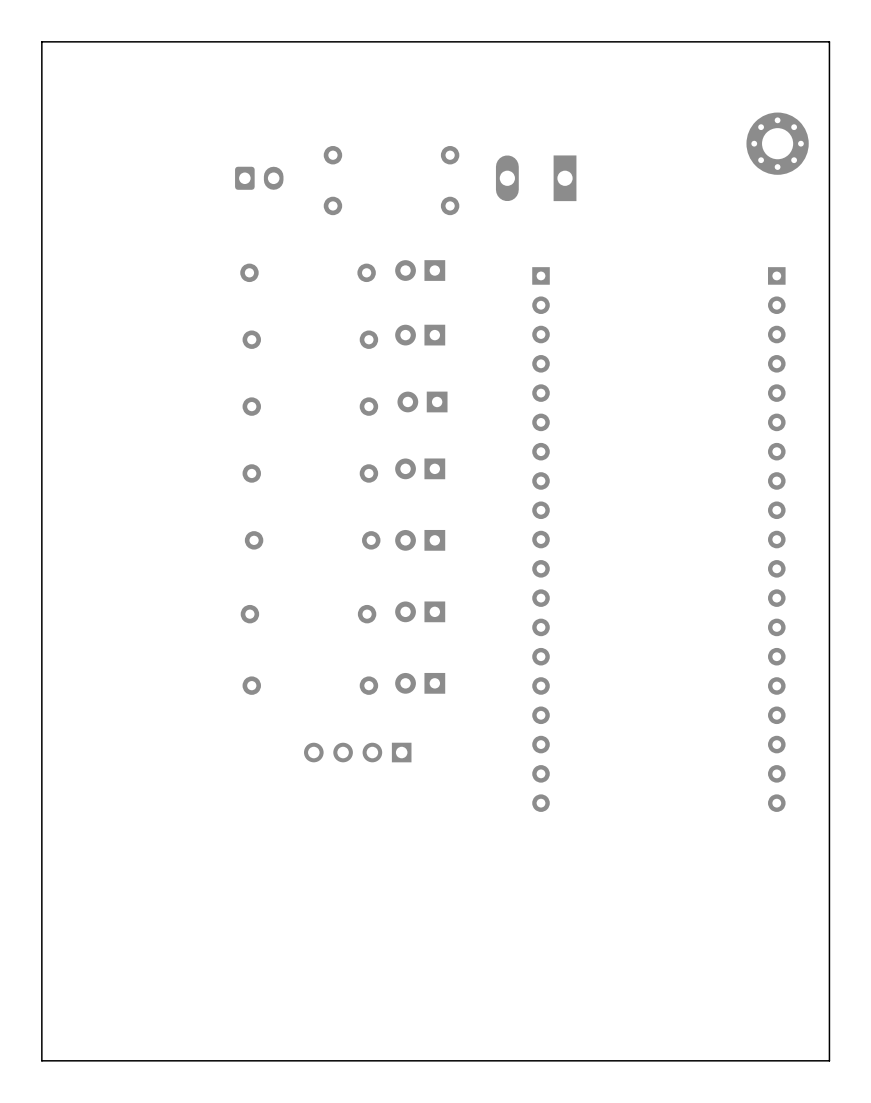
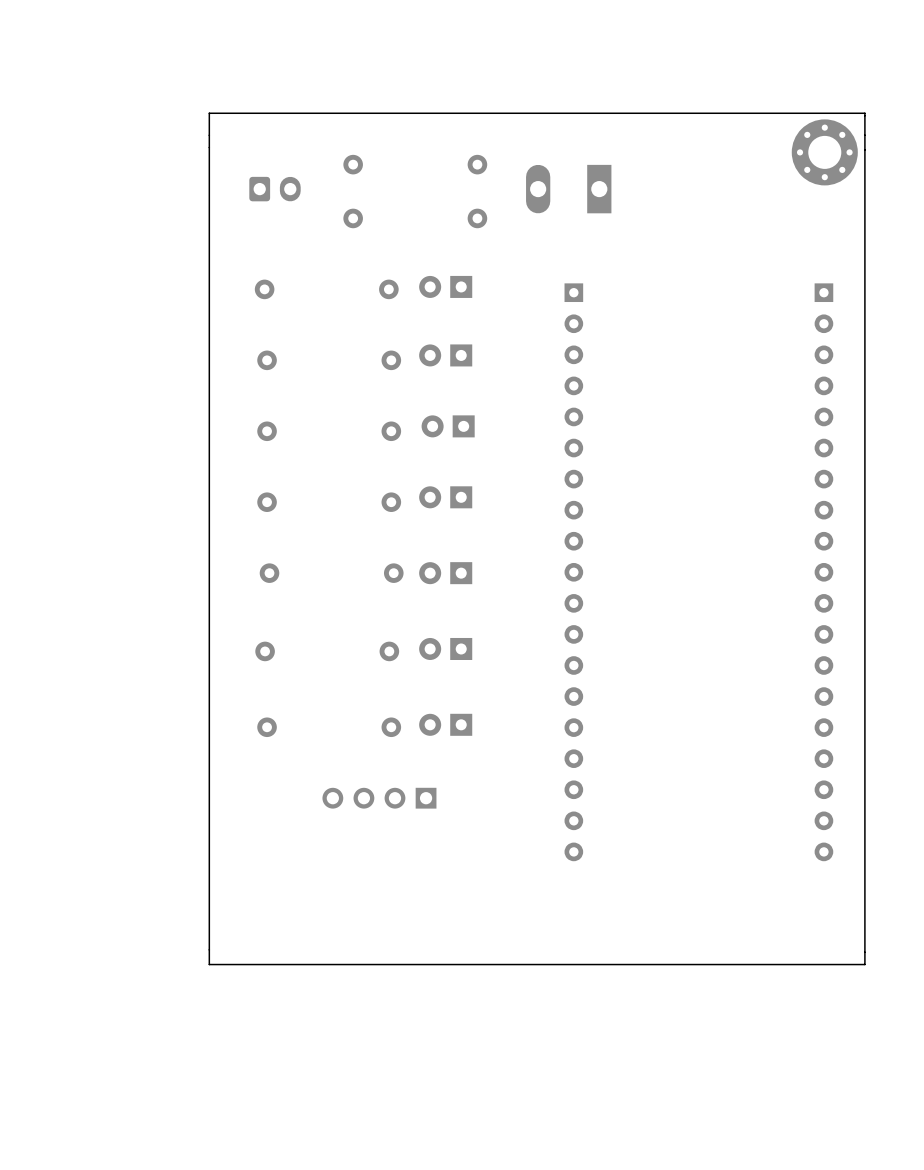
board edge: (829, 41) (41, 41) (41, 1060) (829, 1060) (829, 41) -> (864, 113) (864, 964) (209, 964) (209, 113) (864, 113)

